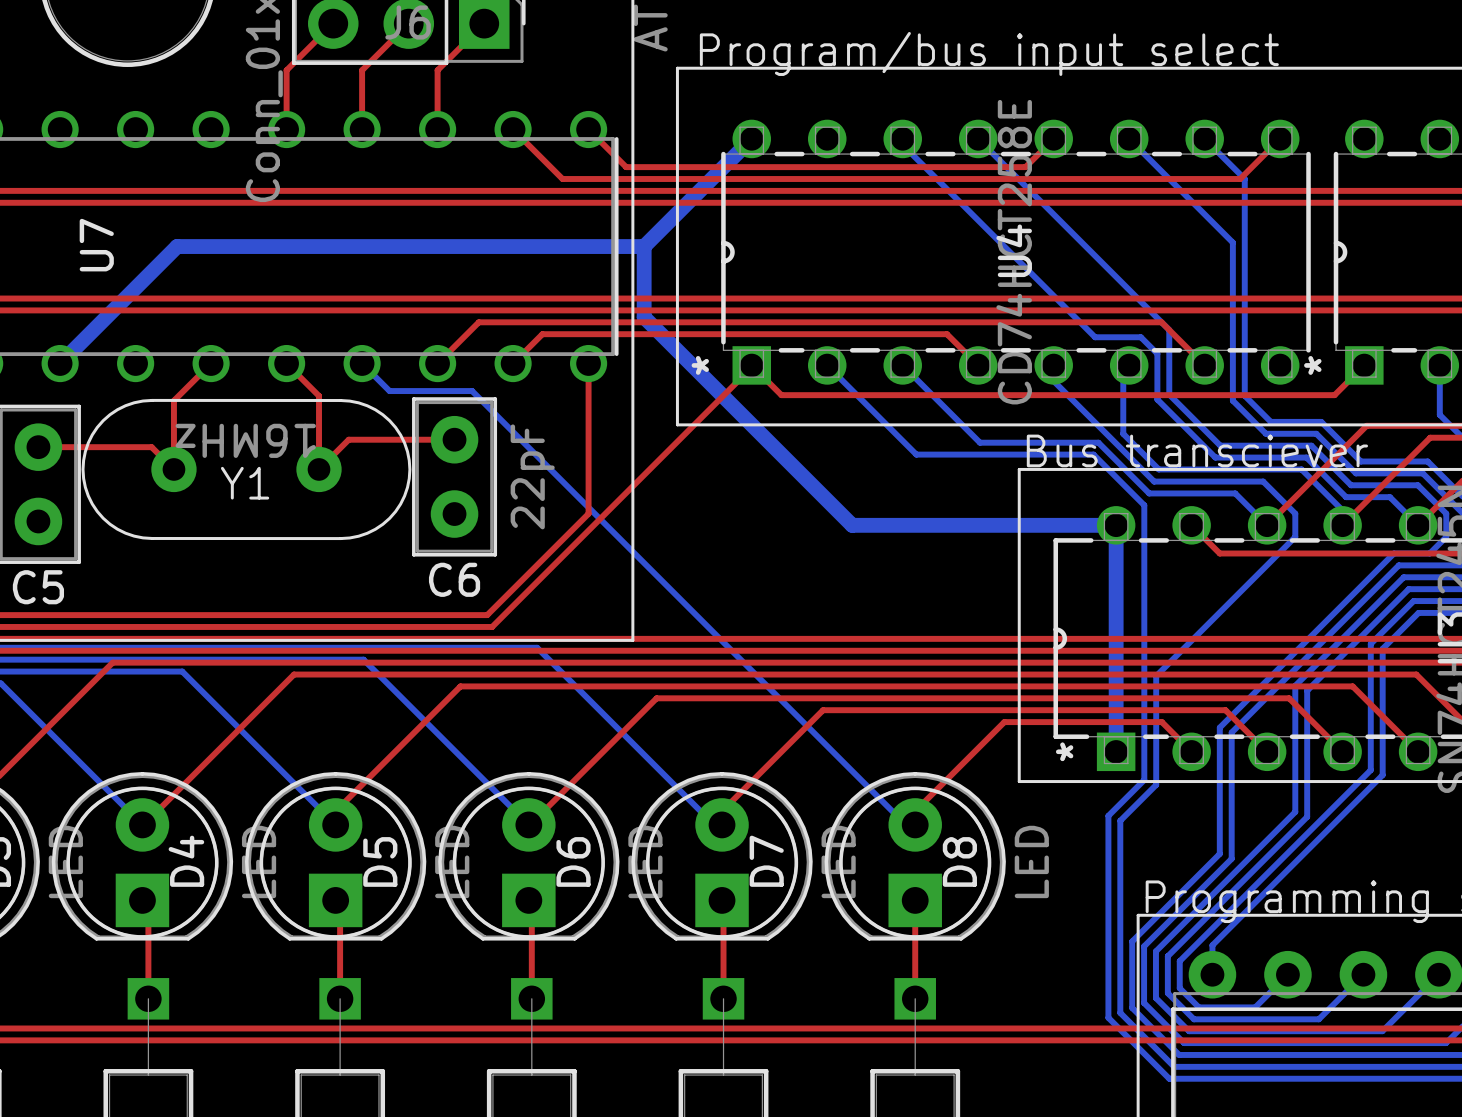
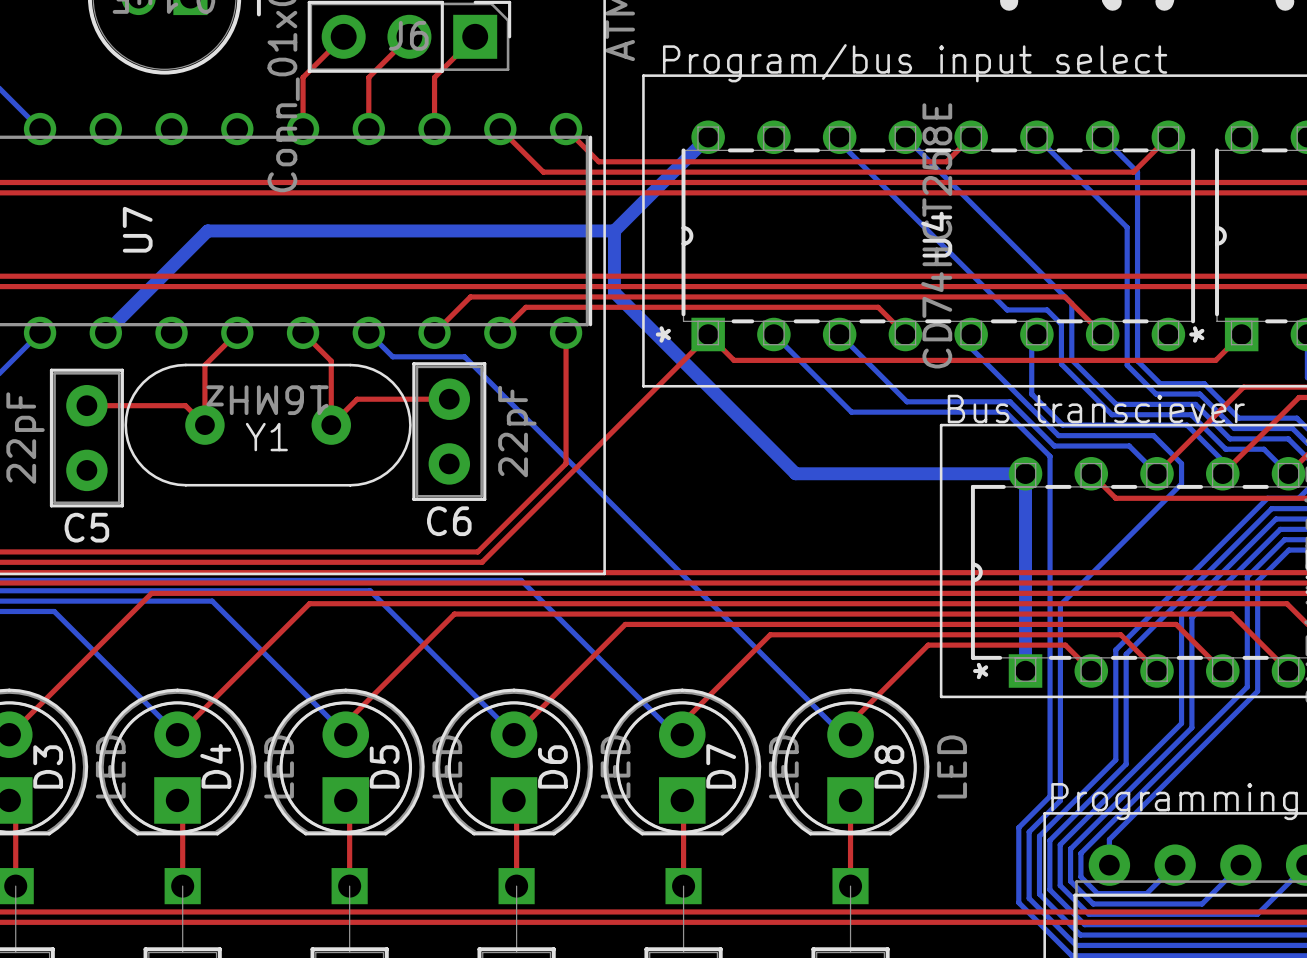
bottom track: (1144, 779) (1108, 815) (1108, 931) -> (1050, 695) (1050, 796) (1018, 827)
bottom track: (1156, 784) (1120, 820) (1120, 936) -> (1060, 699) (1060, 800) (1029, 831)

